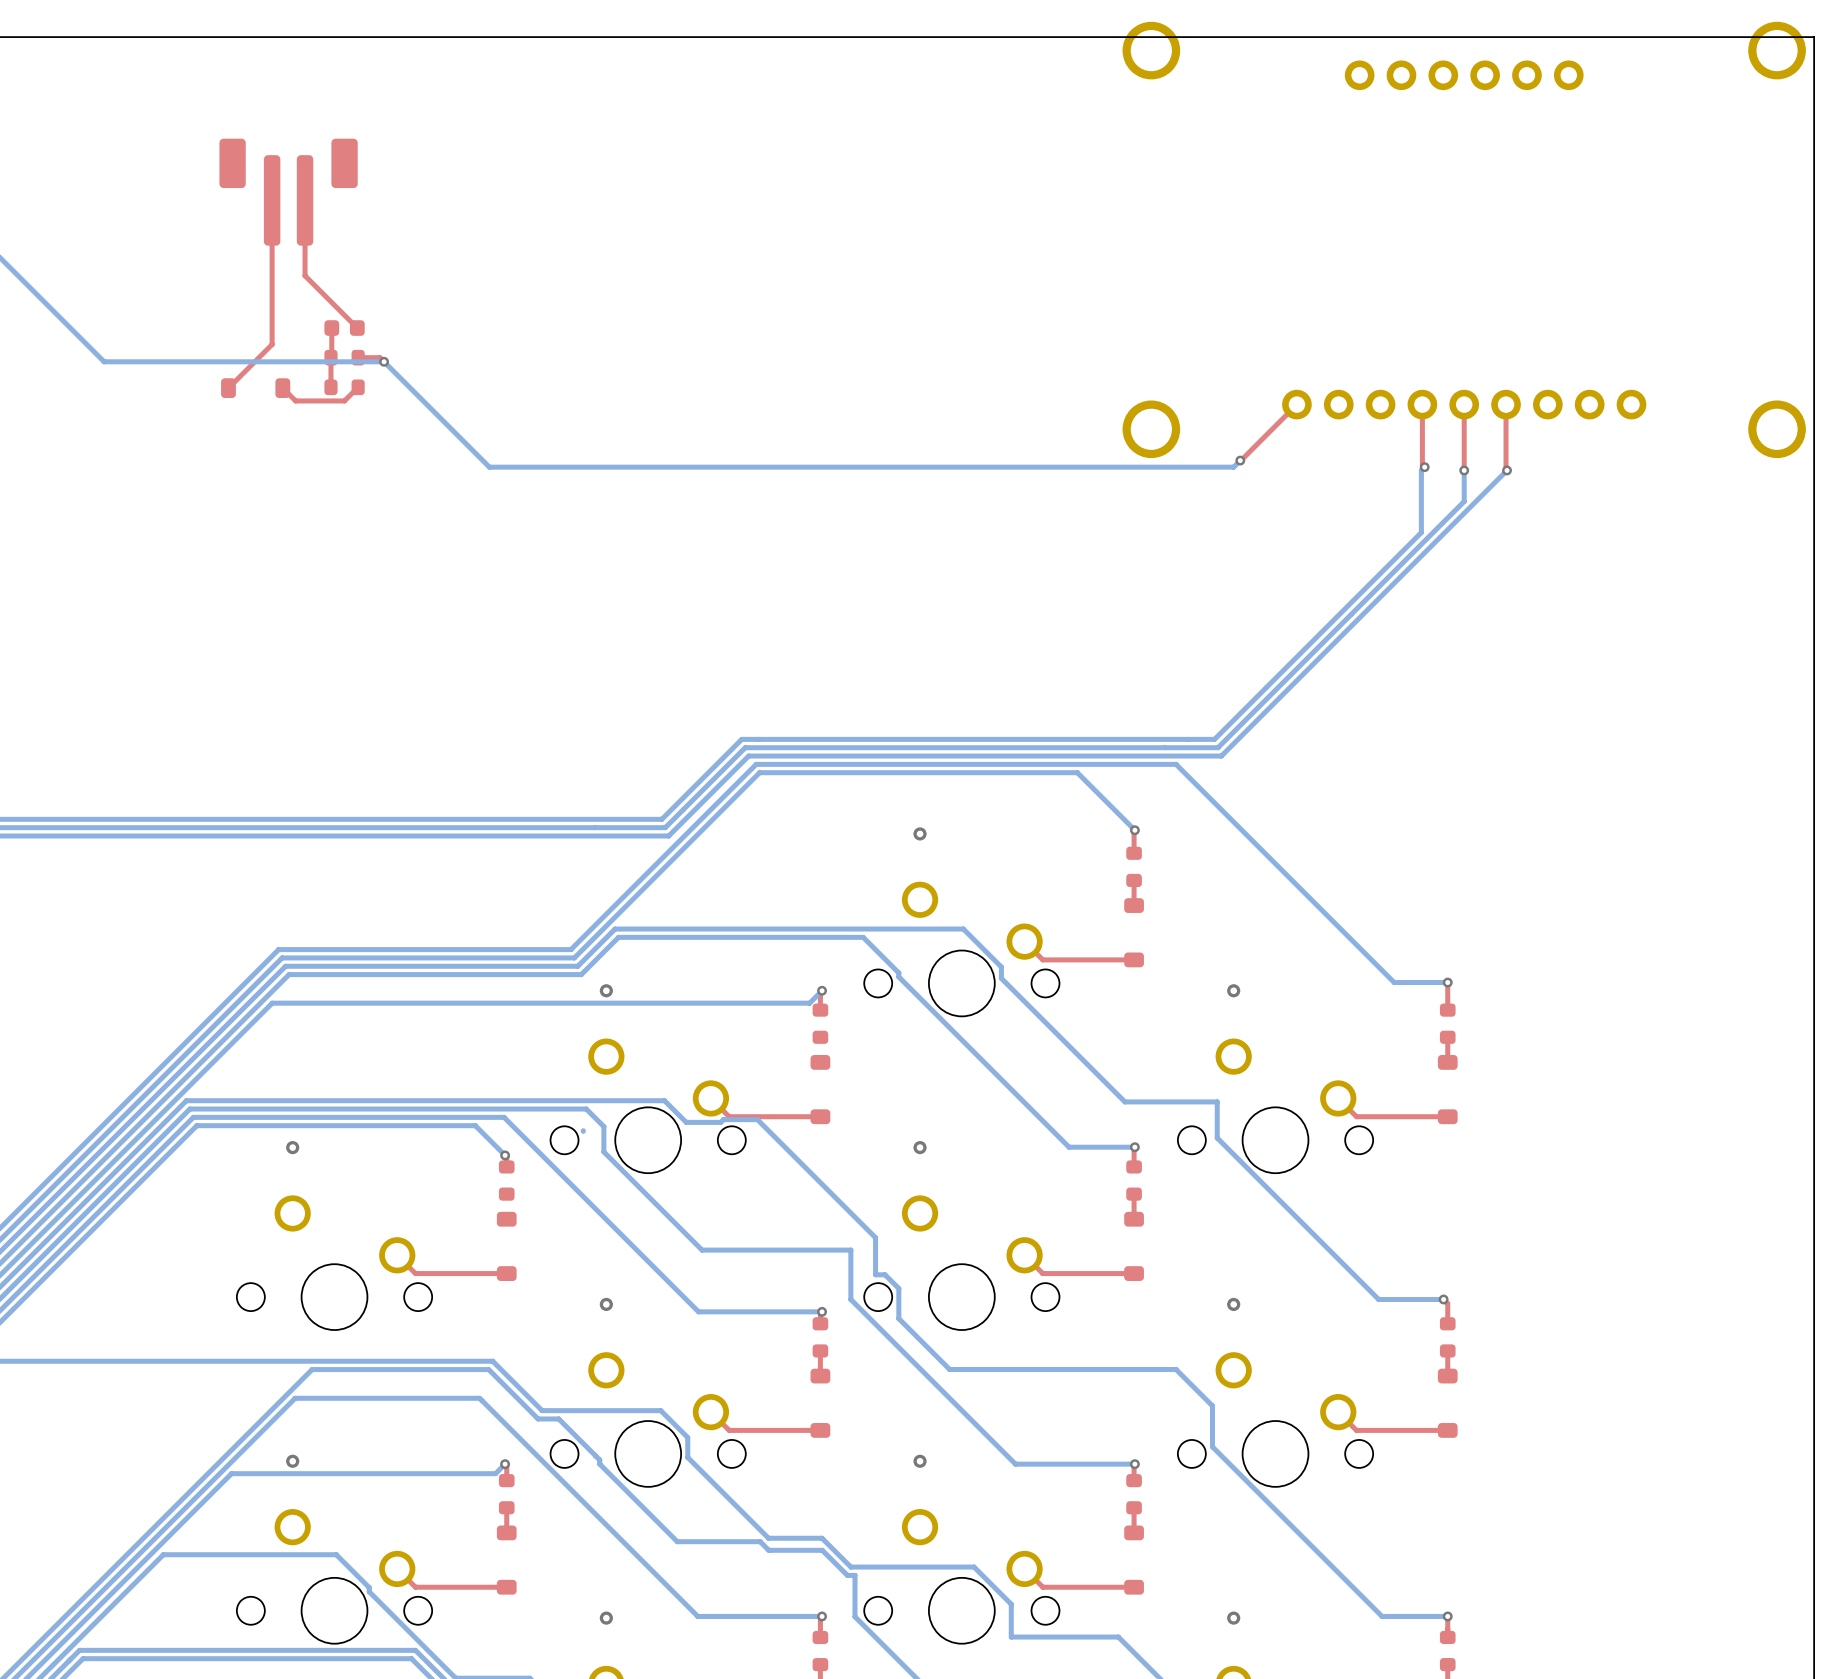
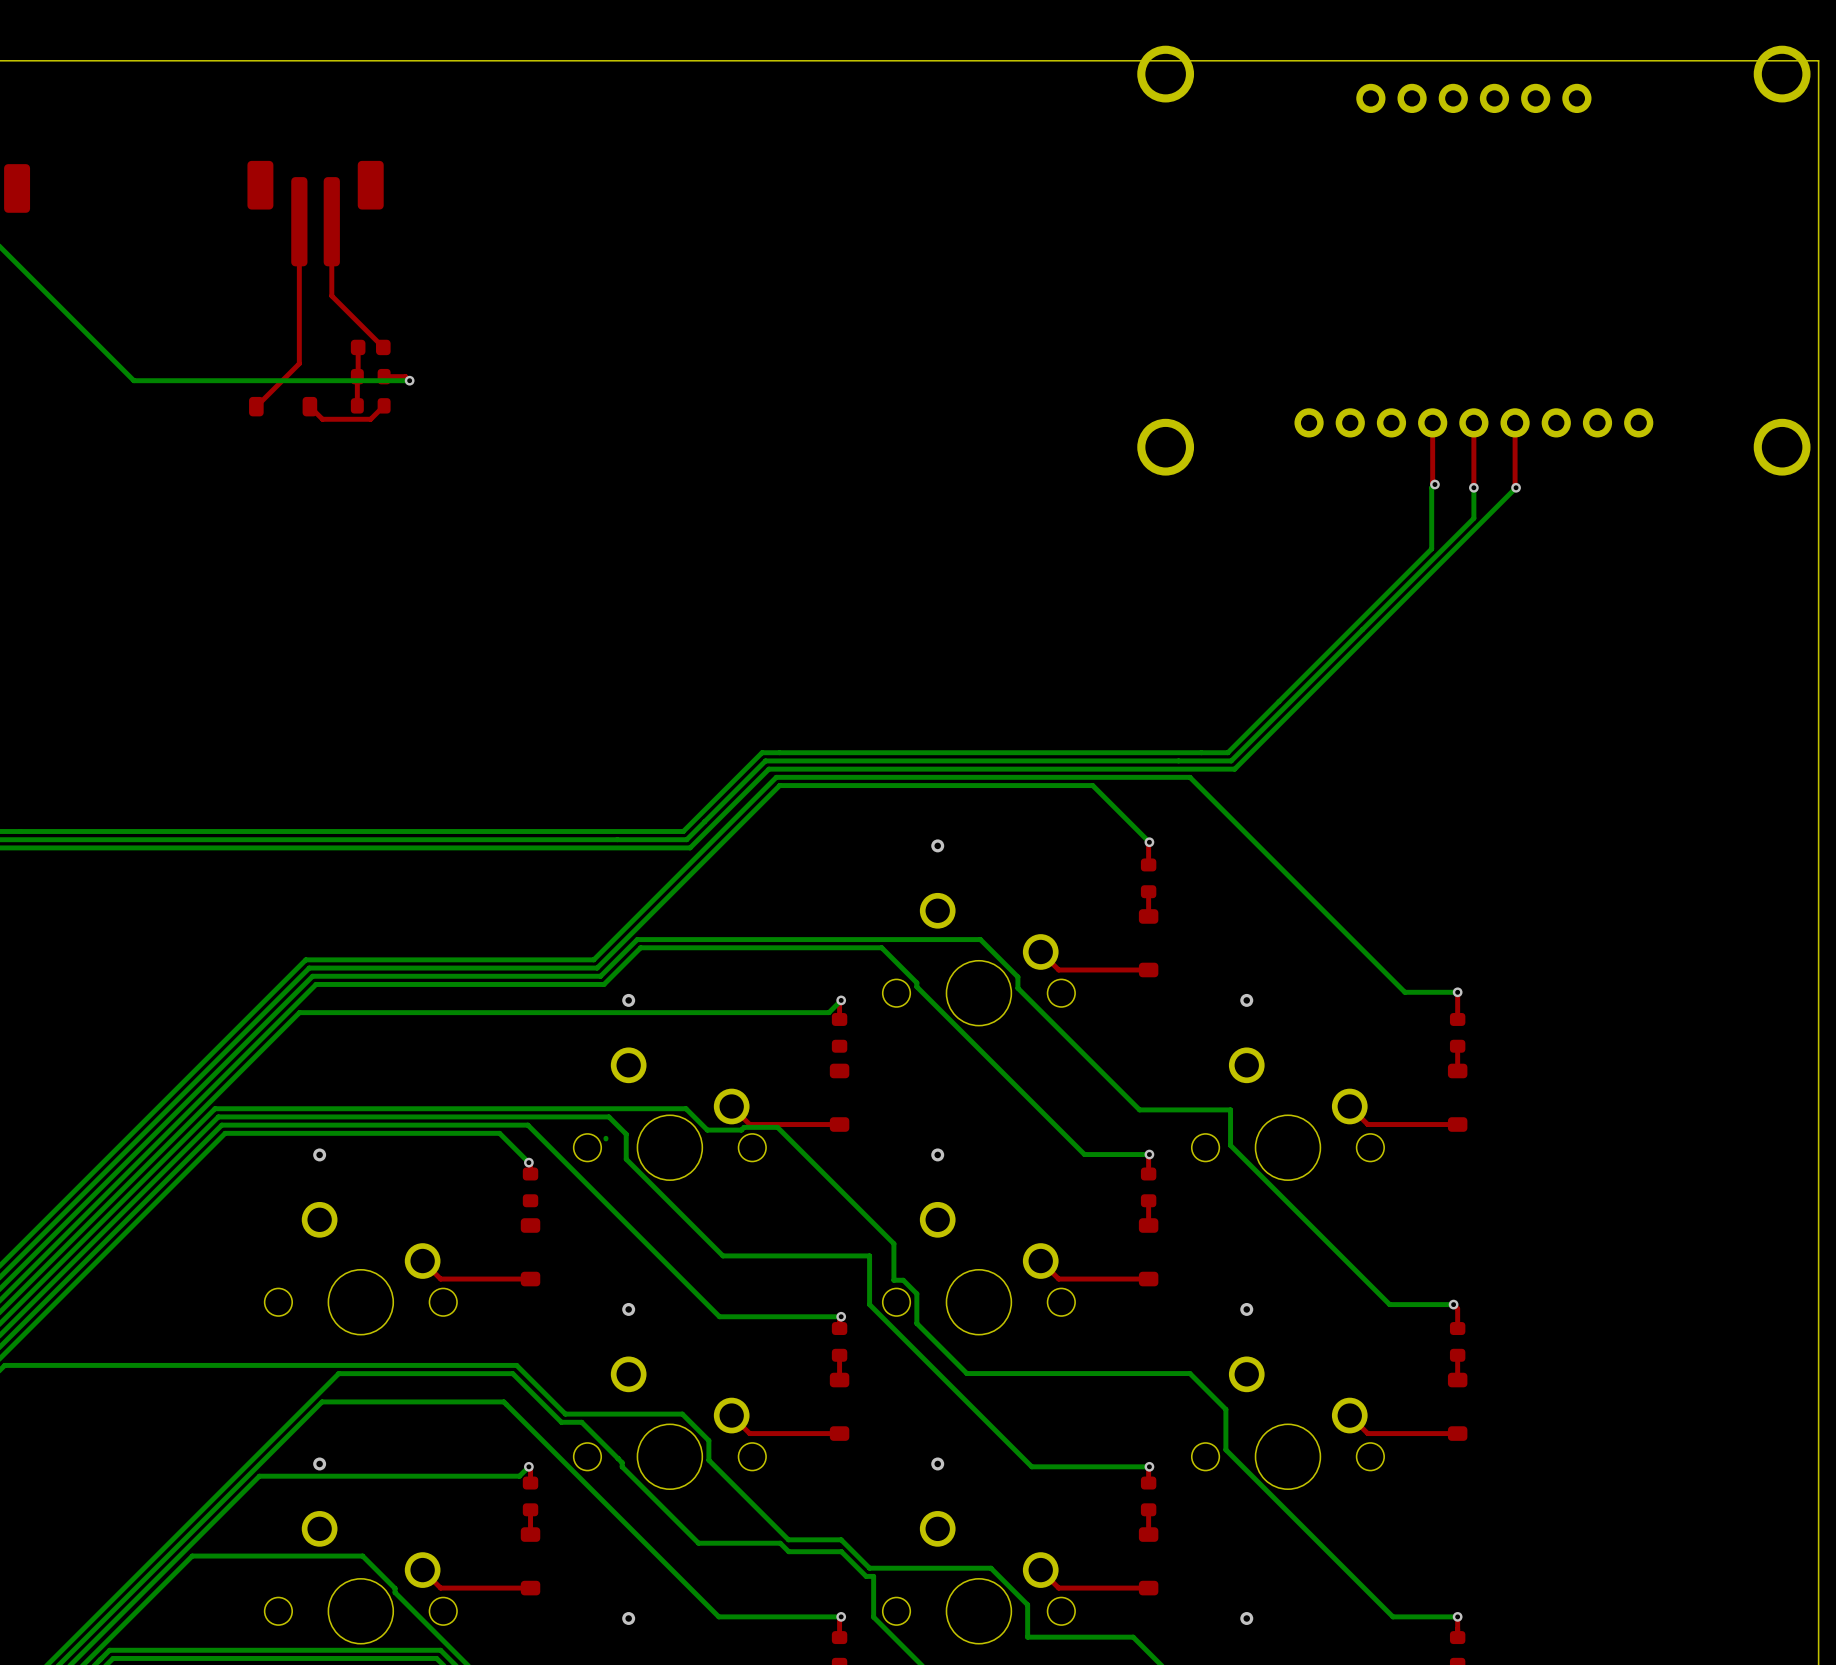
bottom track: (384, 361) (489, 467) (1233, 467) (1240, 460) -> none
top track: (1296, 404) (1240, 460) -> none
via: (1240, 460) -> none

